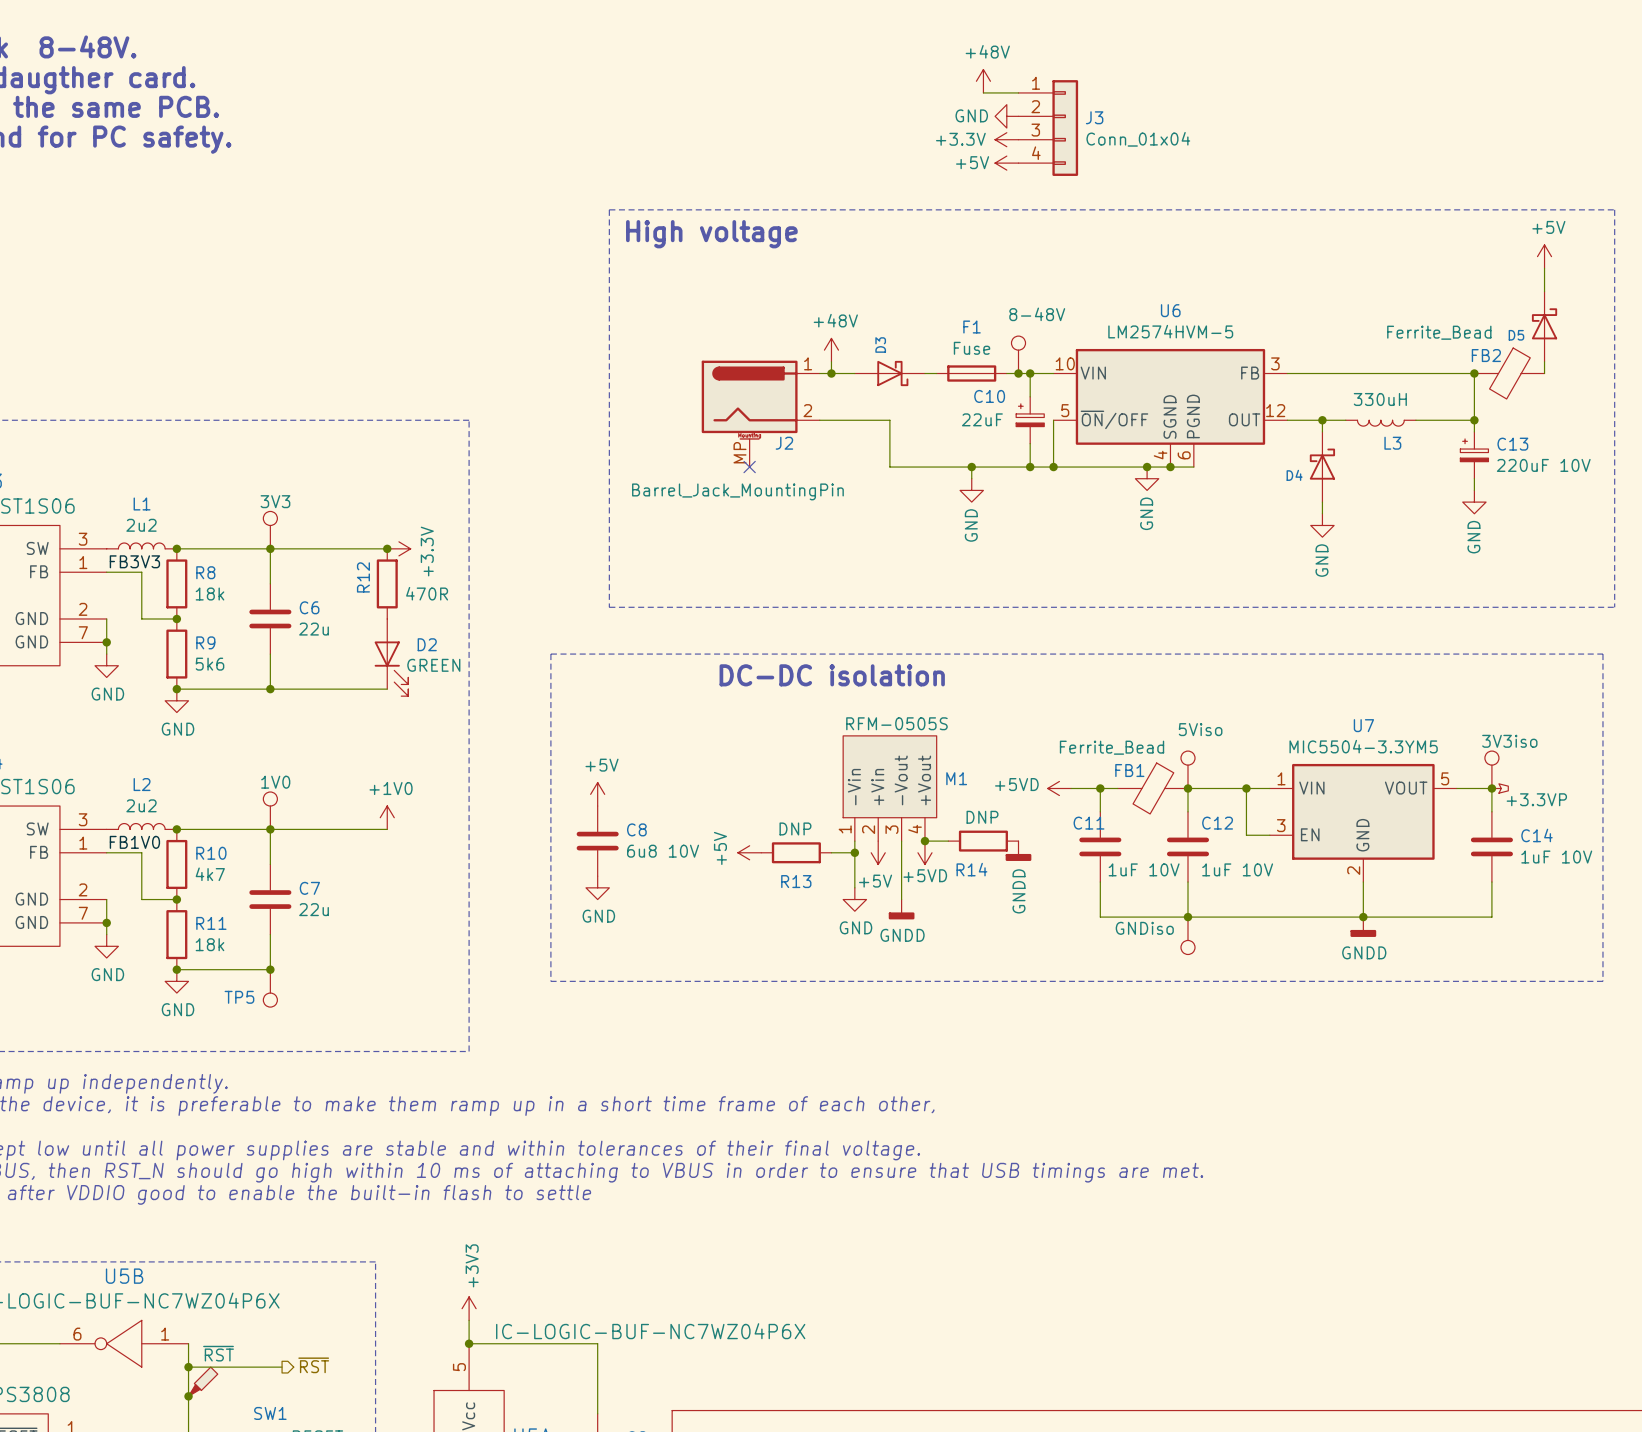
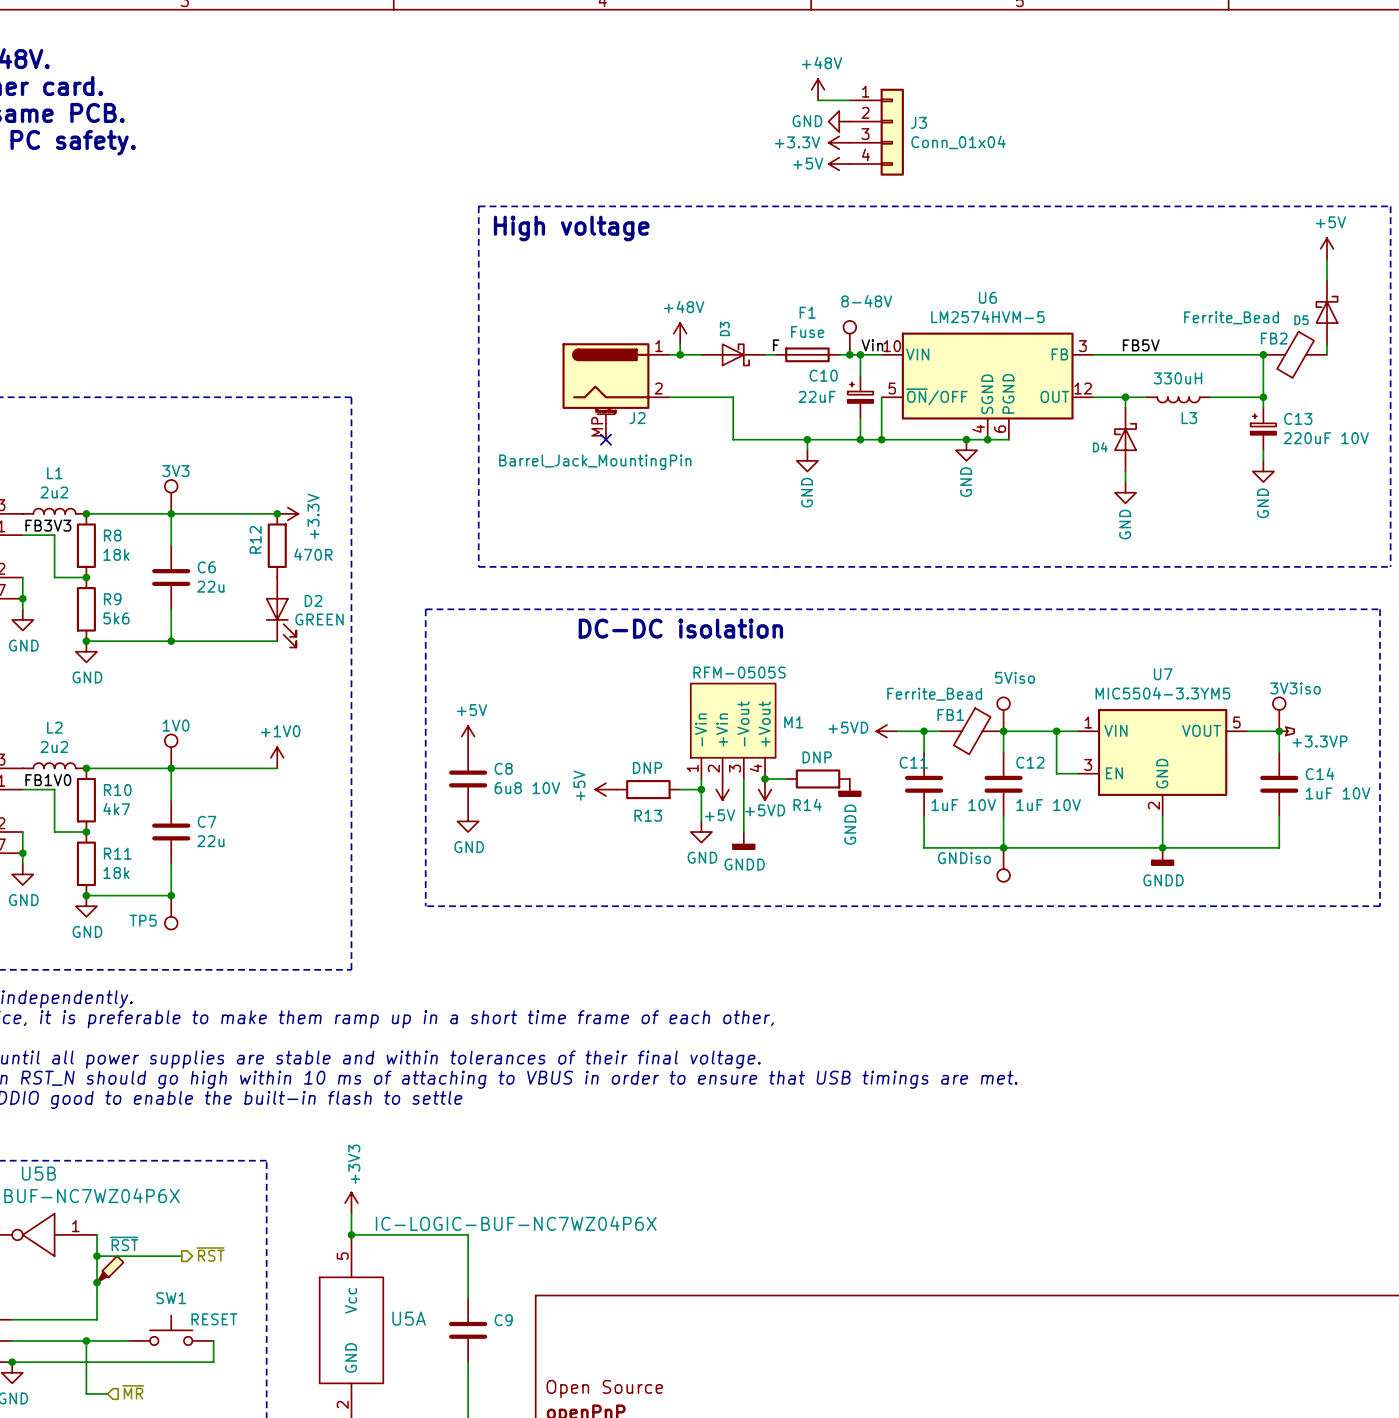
label: none -> F (776, 345)
label: none -> Vin (872, 345)
label: none -> FB5V (1141, 345)

